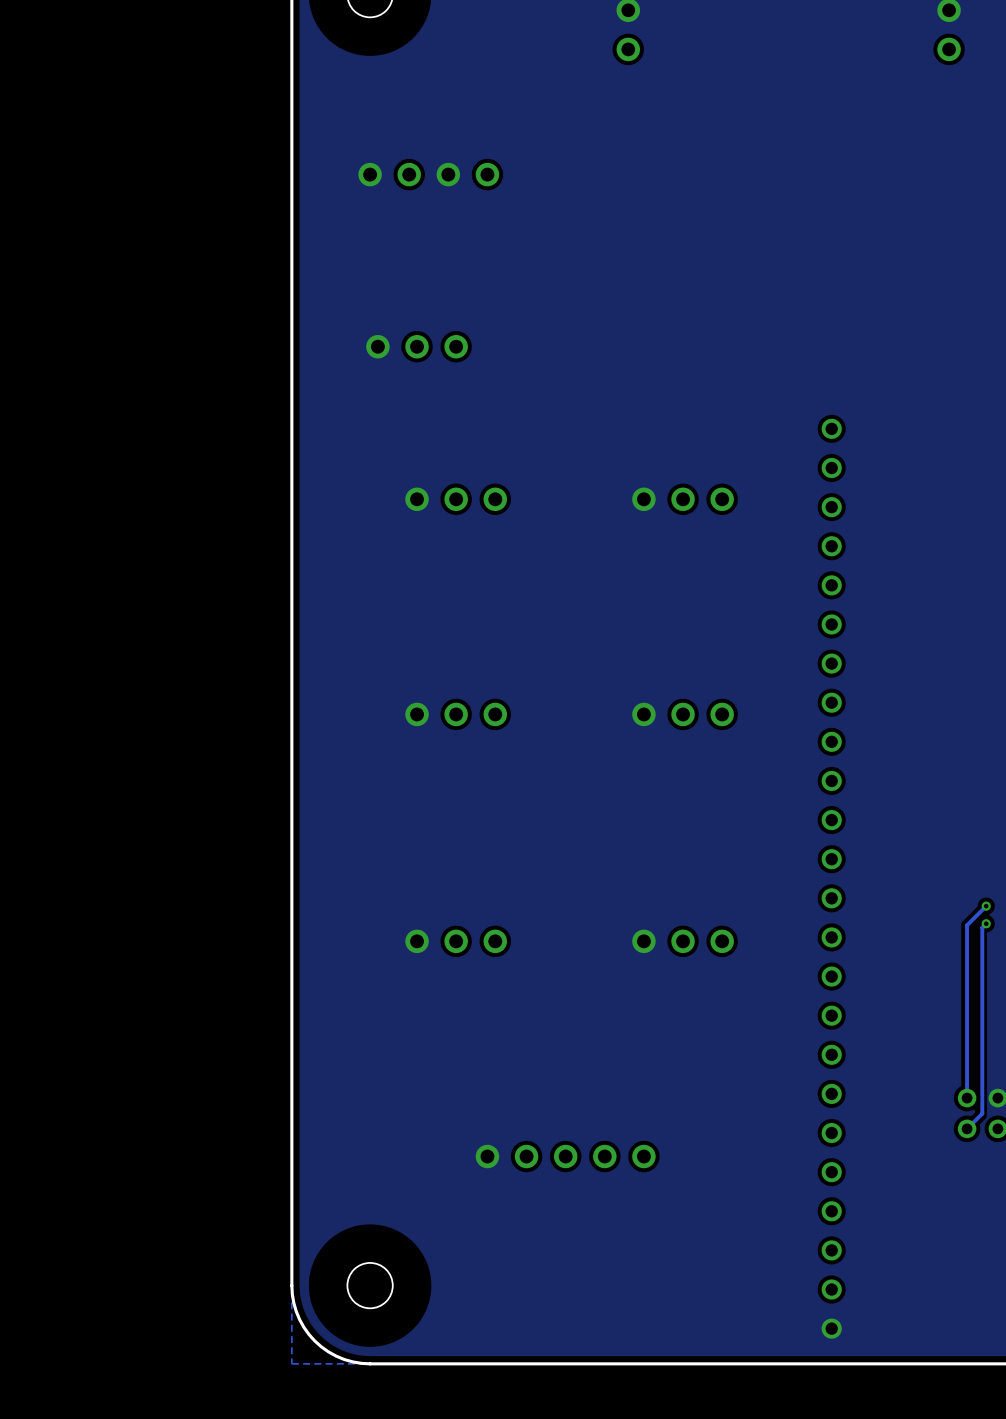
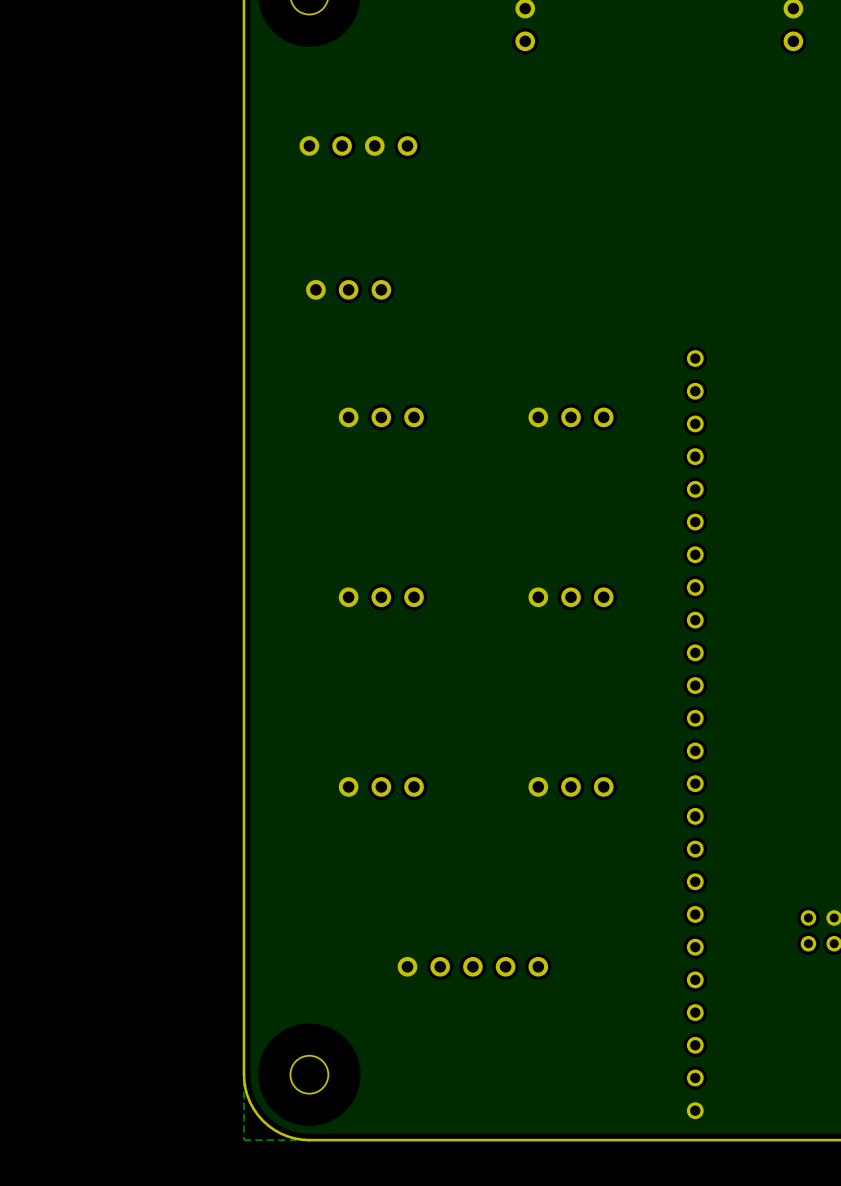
track: (986, 906) (967, 925) (967, 1098) -> none
via: (986, 906) -> none
track: (986, 923) (982, 927) (982, 1113) (967, 1128) -> none
via: (986, 923) -> none

